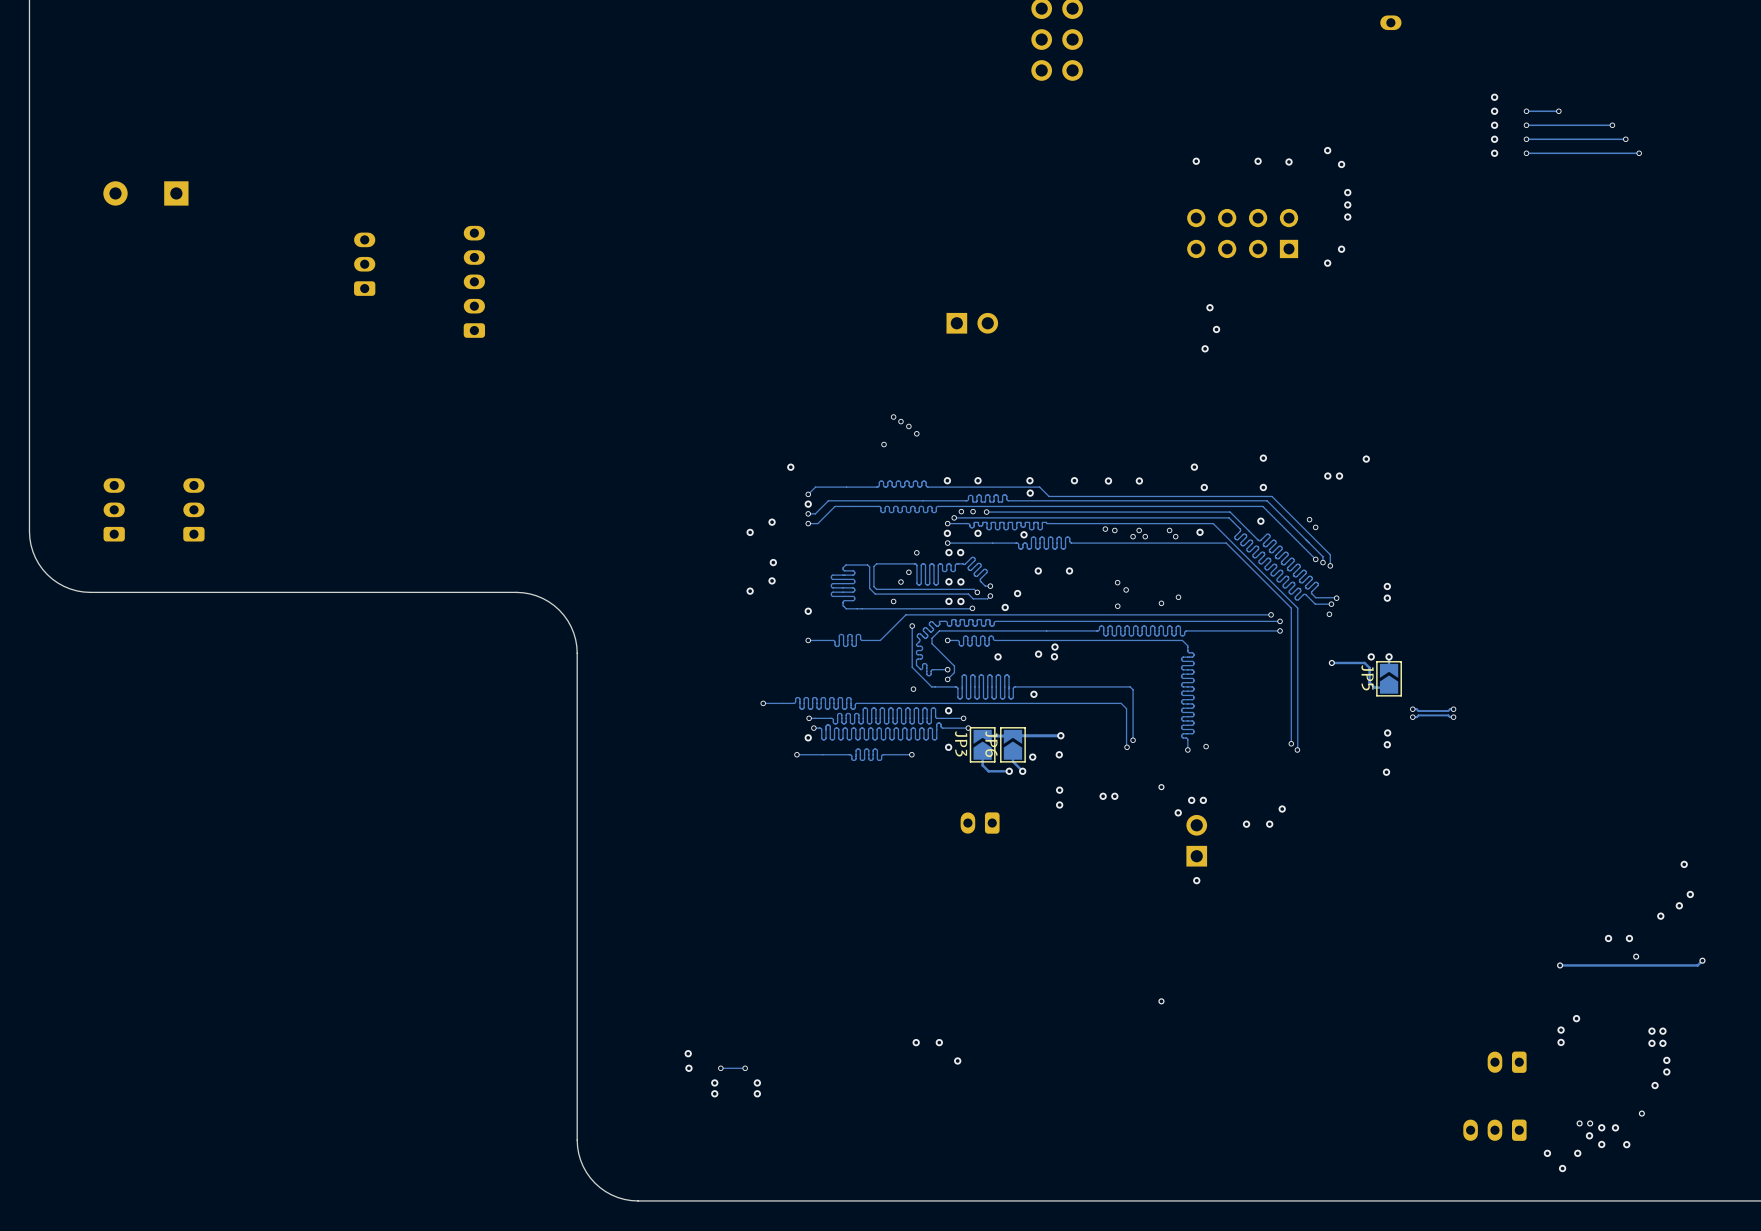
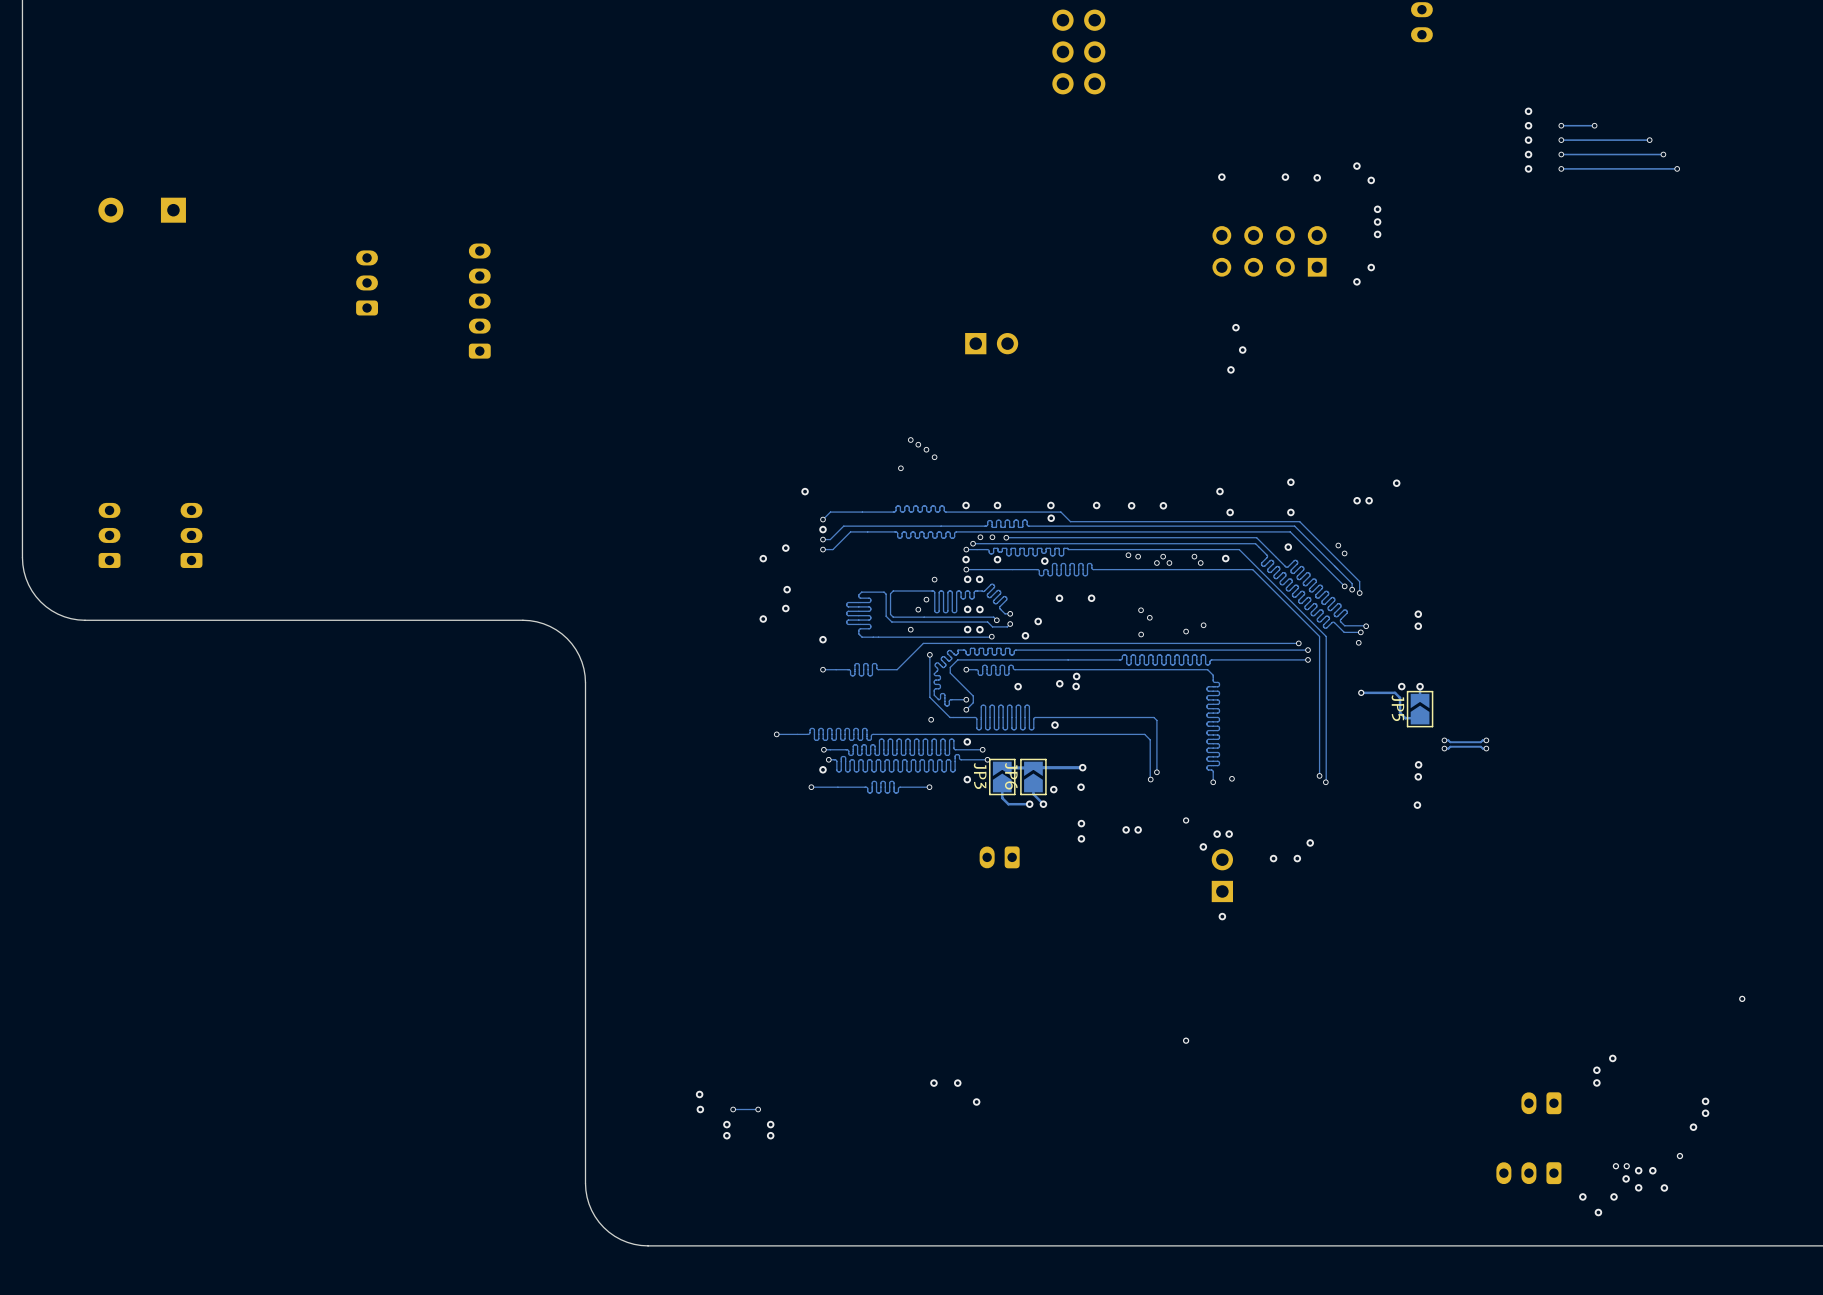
via: (1684, 864) -> none
via: (1690, 894) -> none
via: (1679, 905) -> none
via: (1660, 916) -> none
via: (1608, 938) -> none
via: (1629, 938) -> none
via: (1636, 956) -> none
track: (1702, 960) (1697, 965) (1560, 965) -> none
via: (1560, 965) -> none
via: (1651, 1031) -> none
via: (1662, 1031) -> none
via: (1651, 1043) -> none
via: (1662, 1043) -> none

